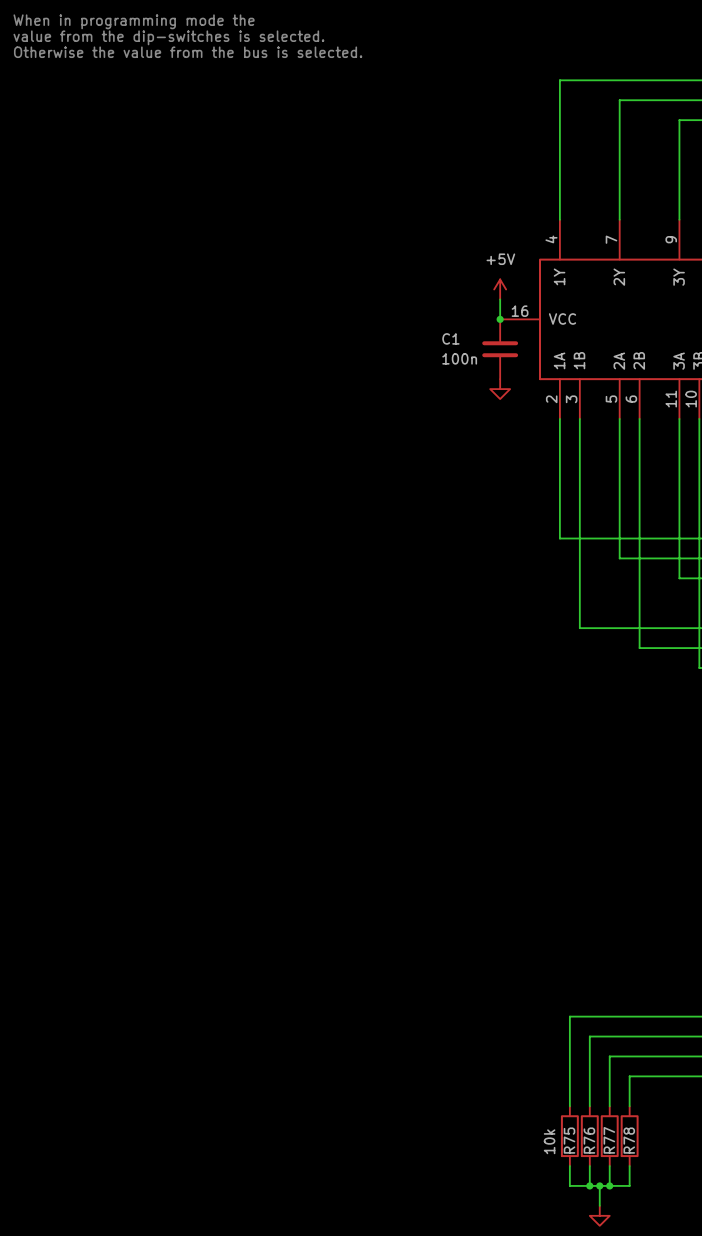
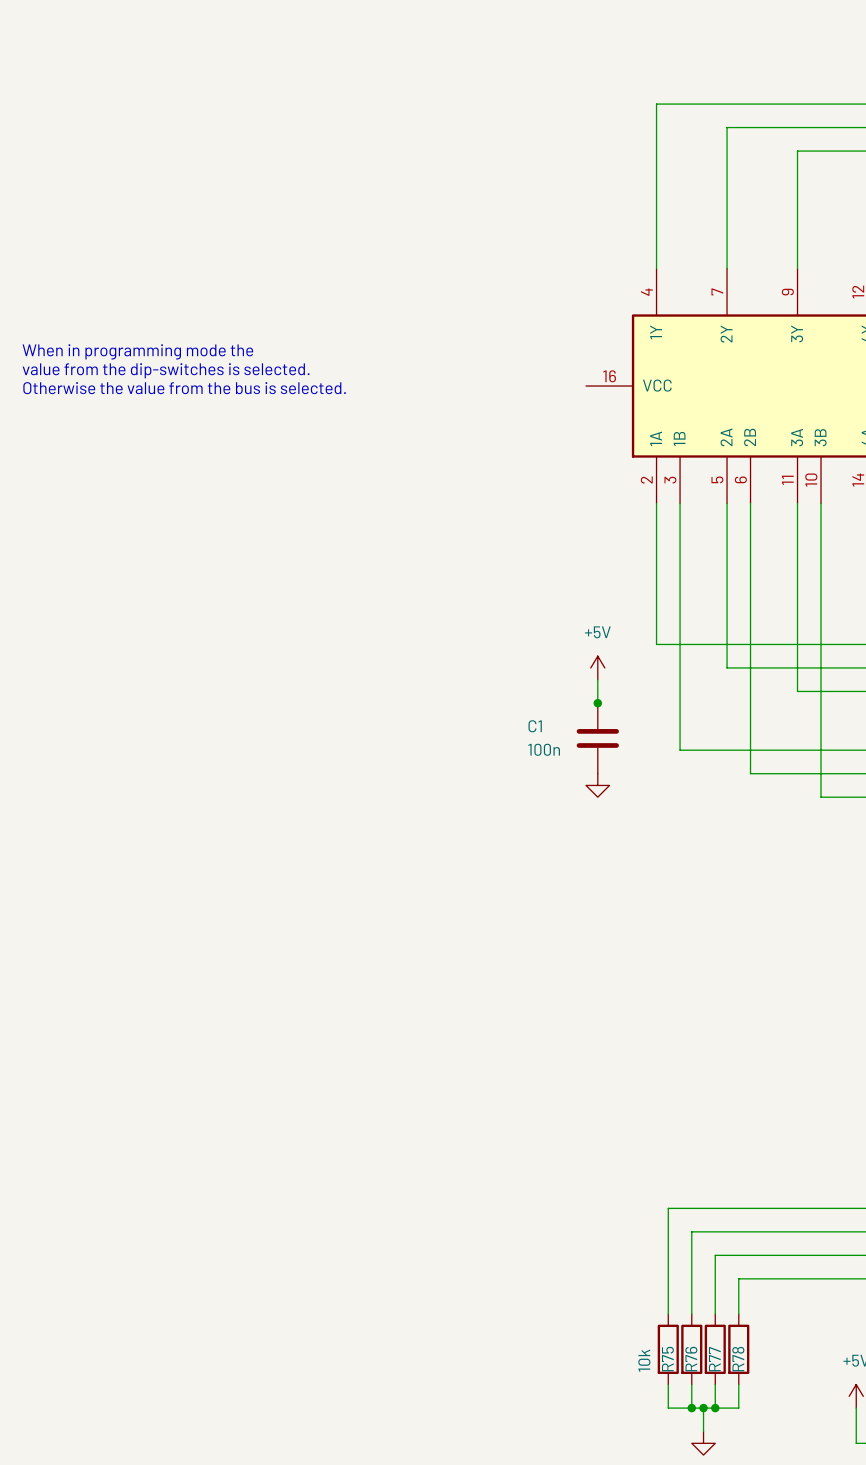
text: When in programming mode the (134, 21) -> none
text: value from the dip-switches is selected. (168, 37) -> none
text: Otherwise the value from the bus is selected. (188, 52) -> none
power symbol: +5V (500, 289) -> none
text: none -> When in programming mode the (137, 351)
wire: (500, 299) (500, 319) -> none
text: none -> value from the dip-switches is selected. (166, 370)
junction: (500, 319) -> none
text: none -> Otherwise the value from the bus is selected. (184, 388)
C1: 100n (500, 349) -> none
power symbol: (500, 389) -> none
power symbol: none -> +5V (597, 667)
wire: none -> (597, 679) (597, 703)
junction: none -> (597, 703)
C1: none -> 100n (597, 738)
power symbol: none -> (597, 785)

